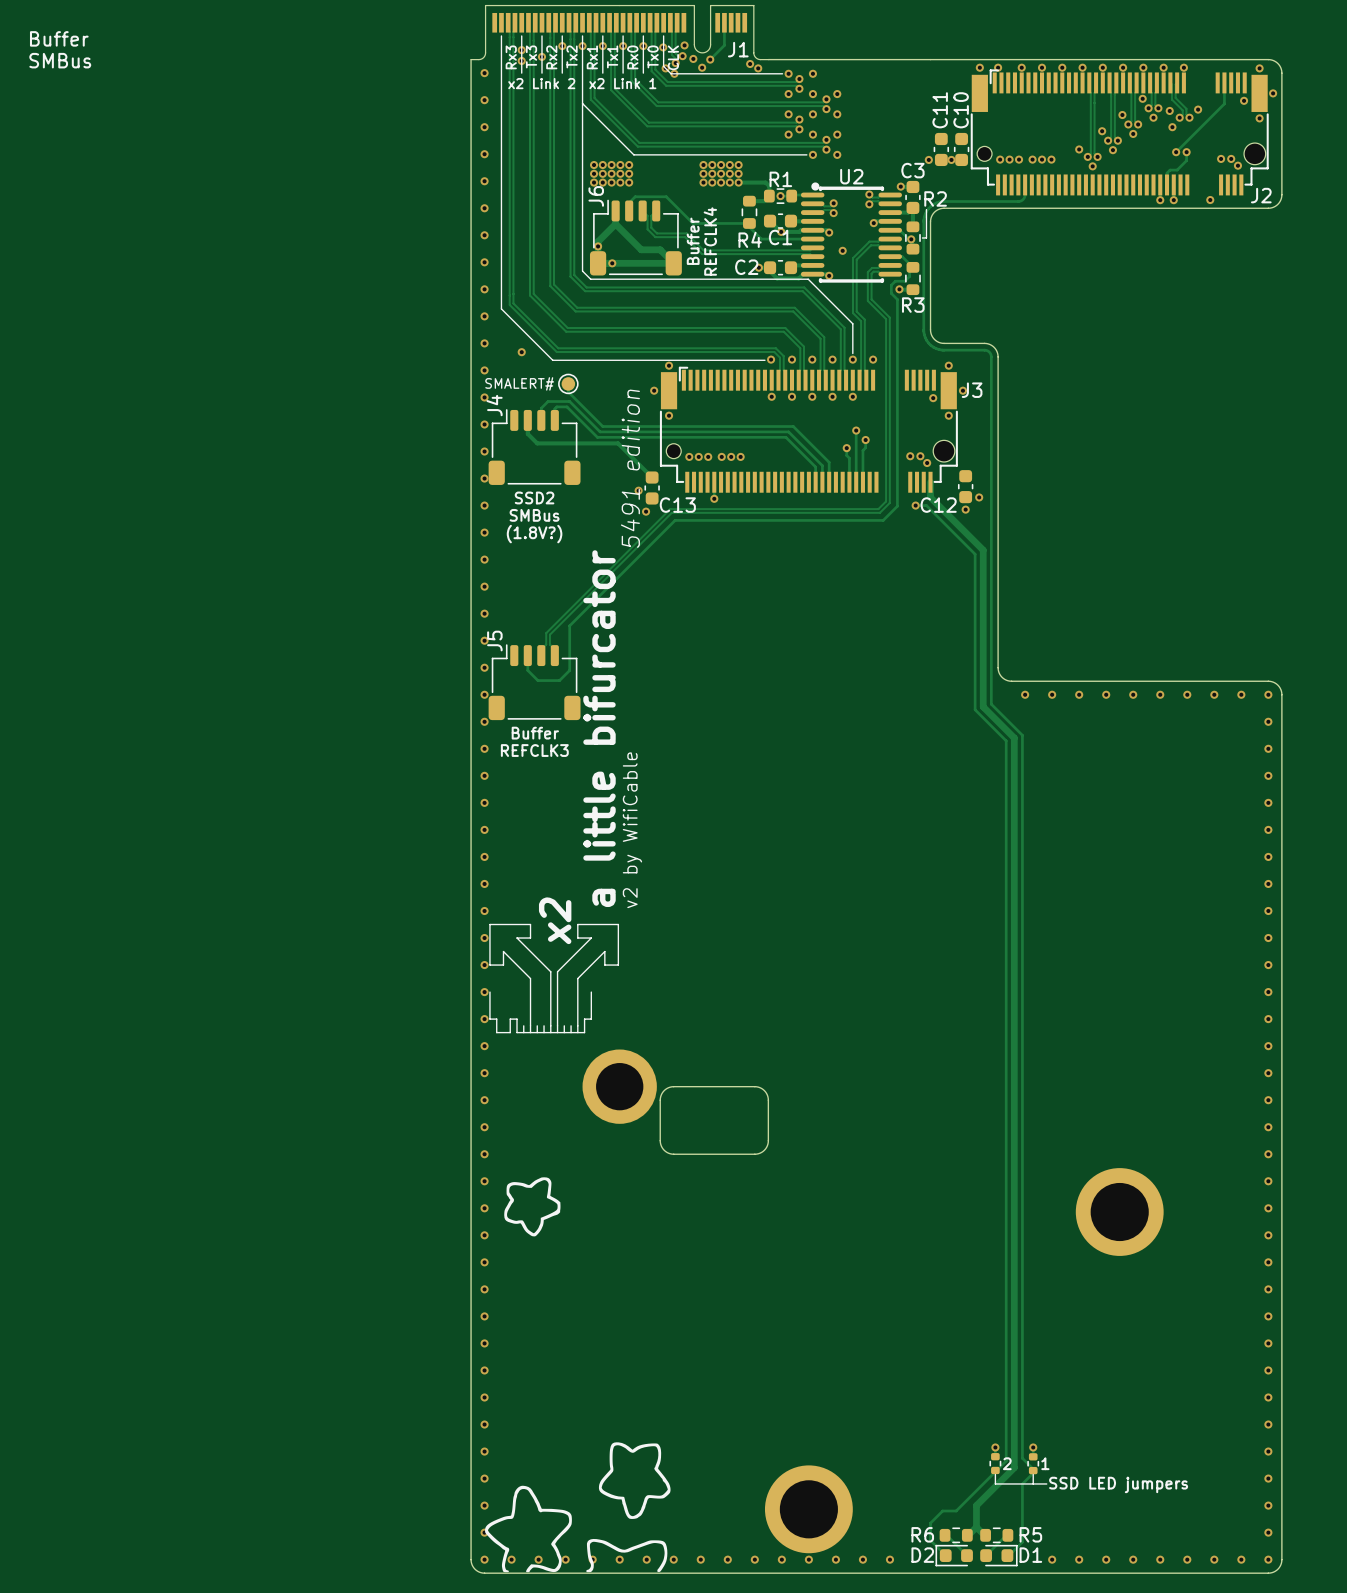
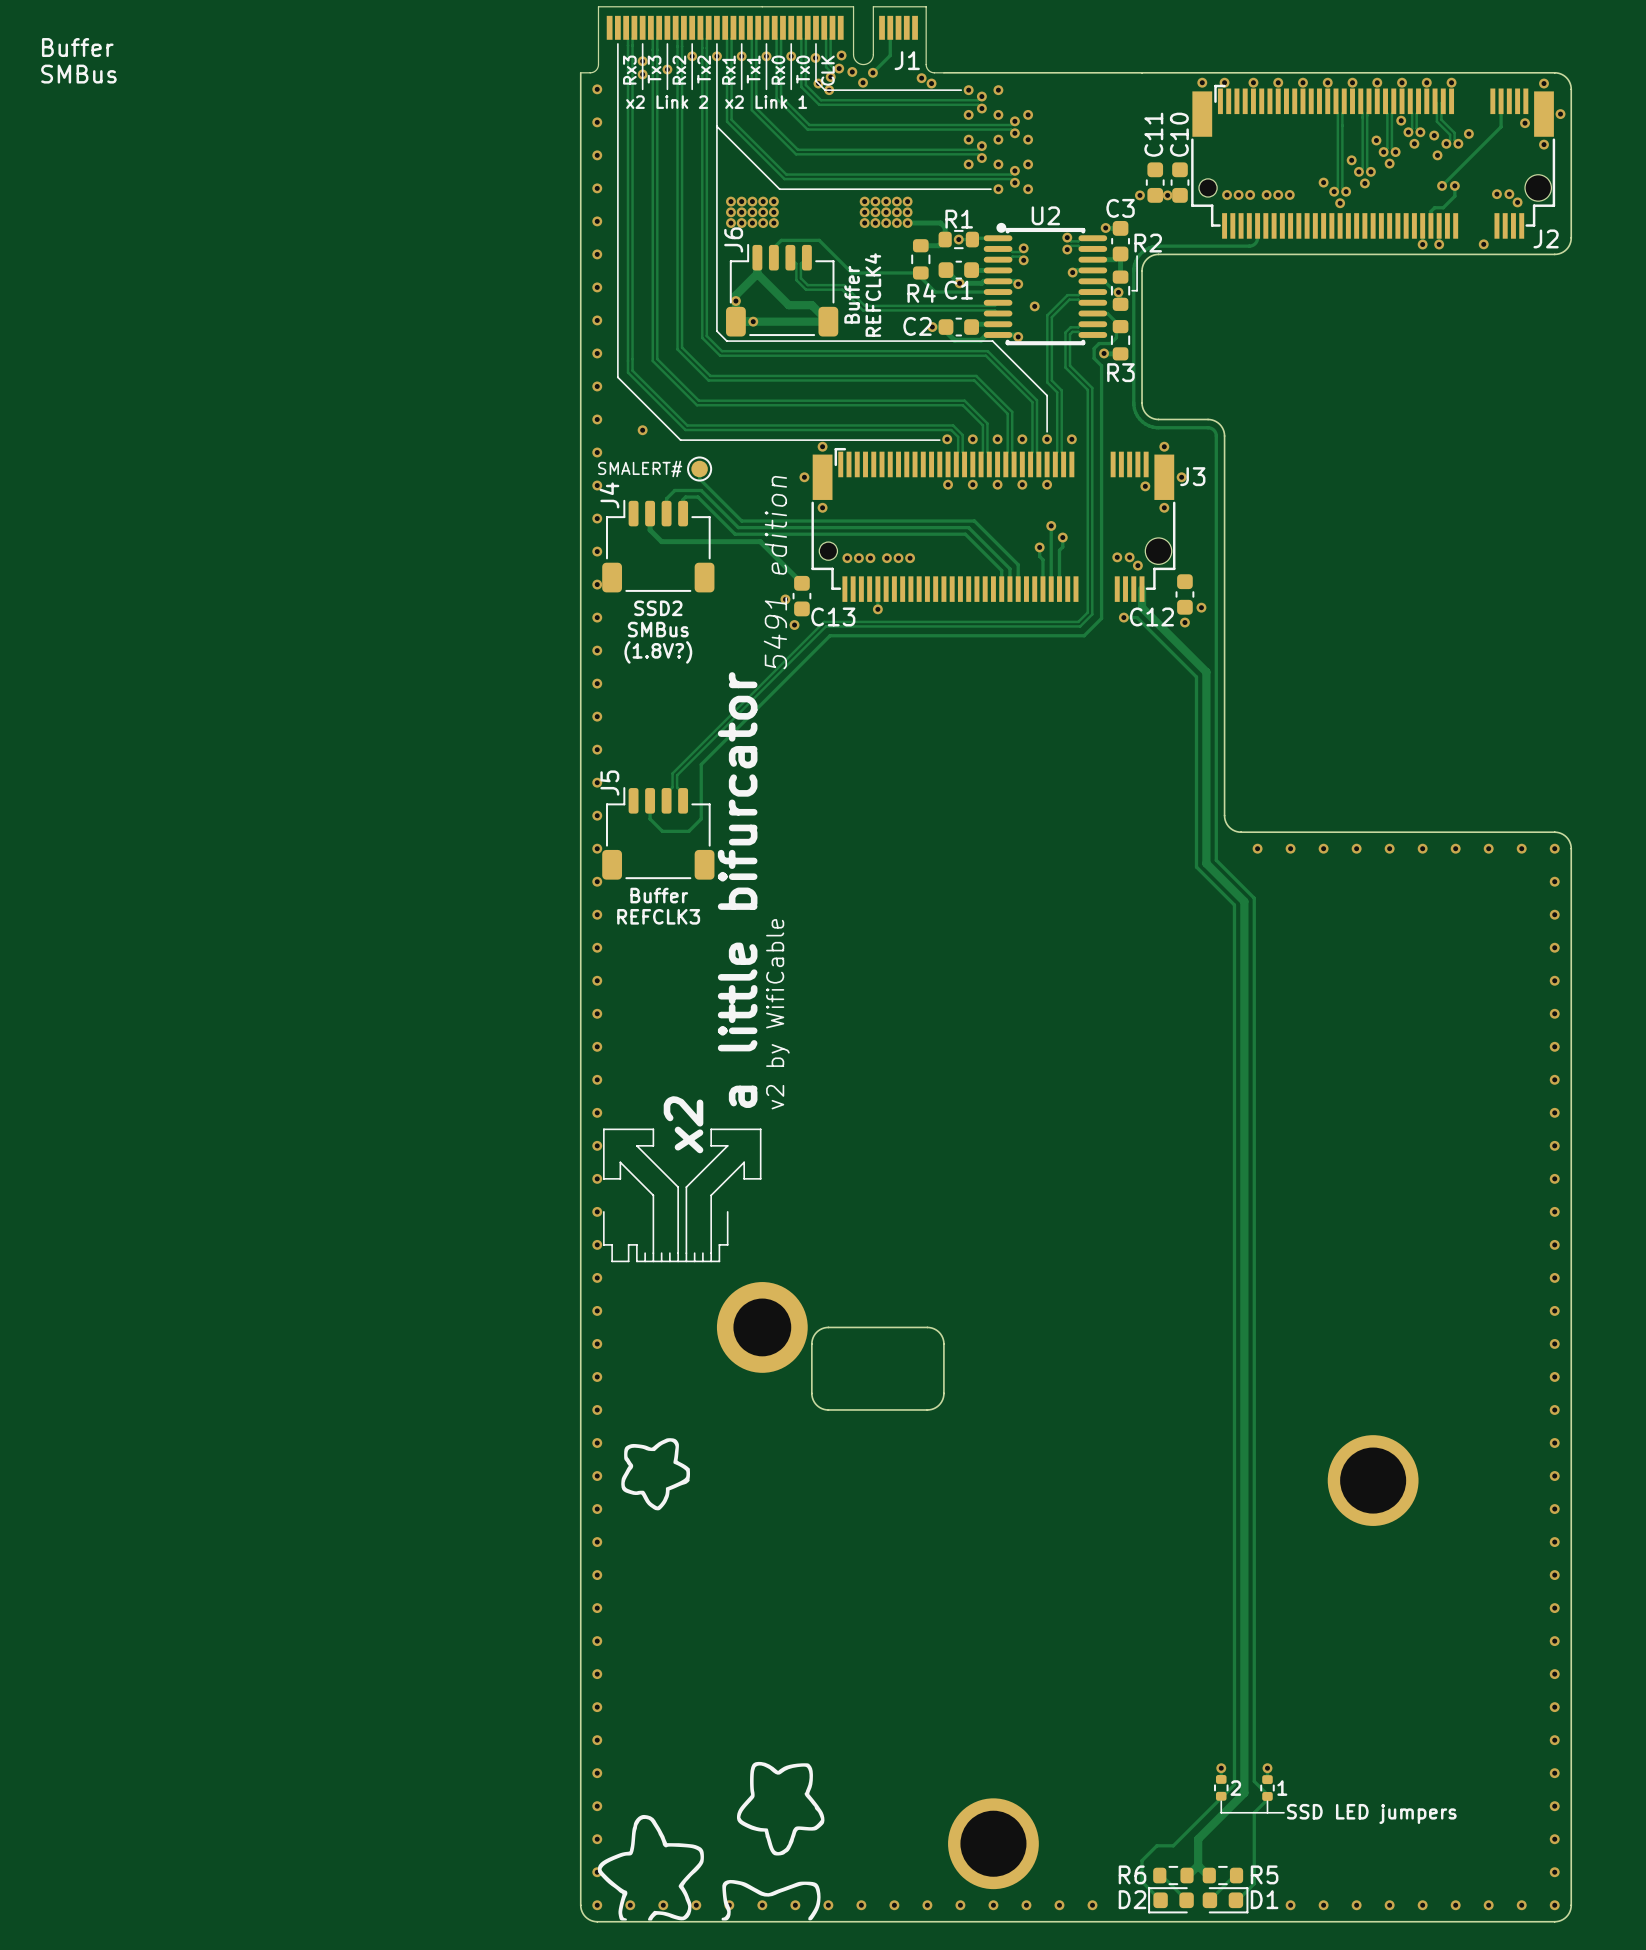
part footprint: [1075, 1168, 1164, 1256] -> [1327, 1435, 1419, 1526]
part footprint: [764, 1465, 853, 1554] -> [948, 1798, 1039, 1890]

